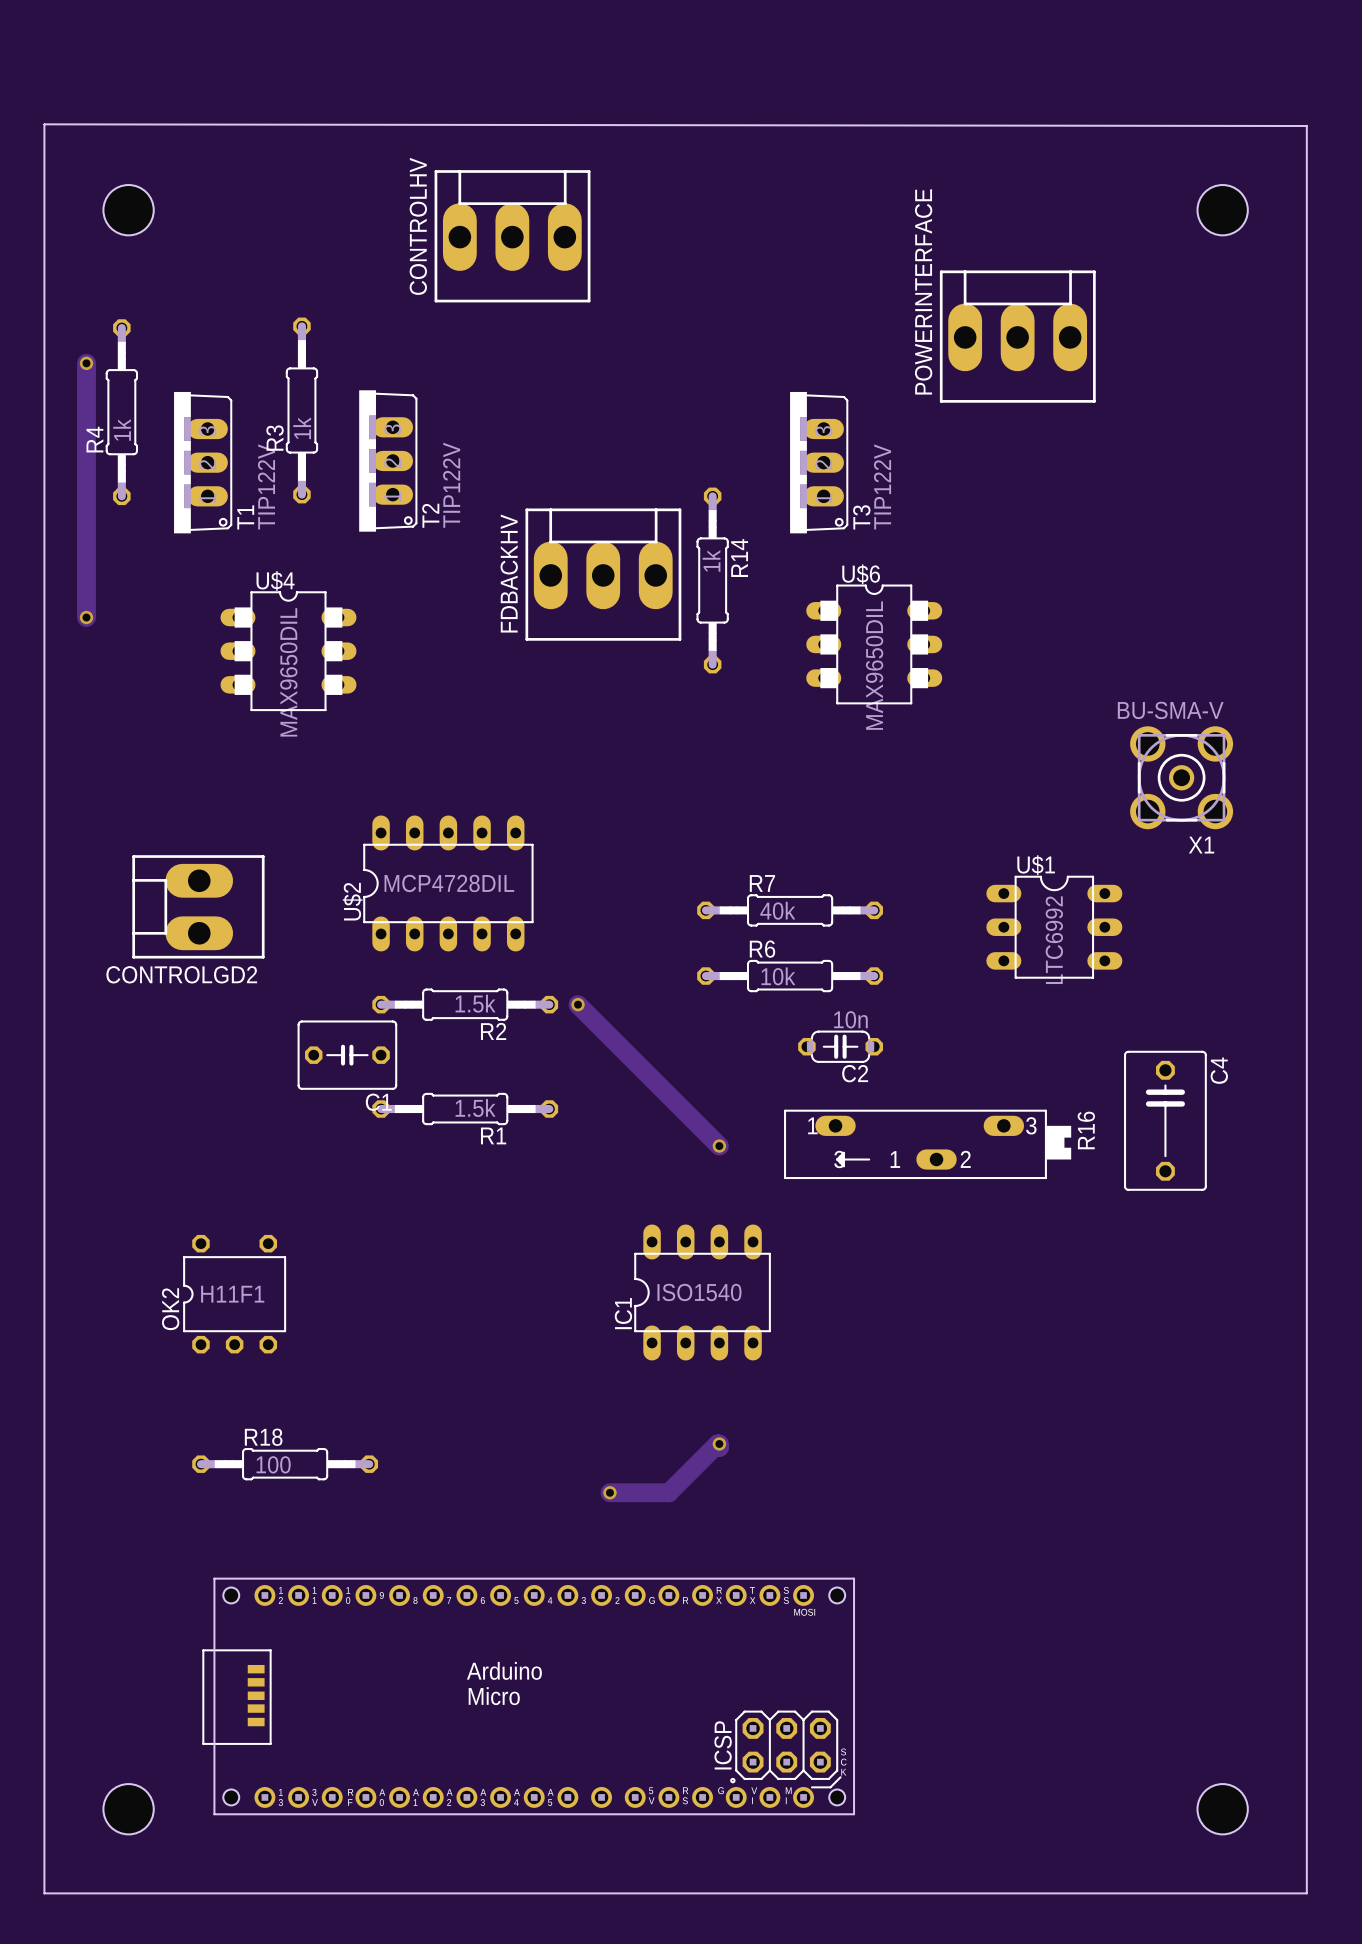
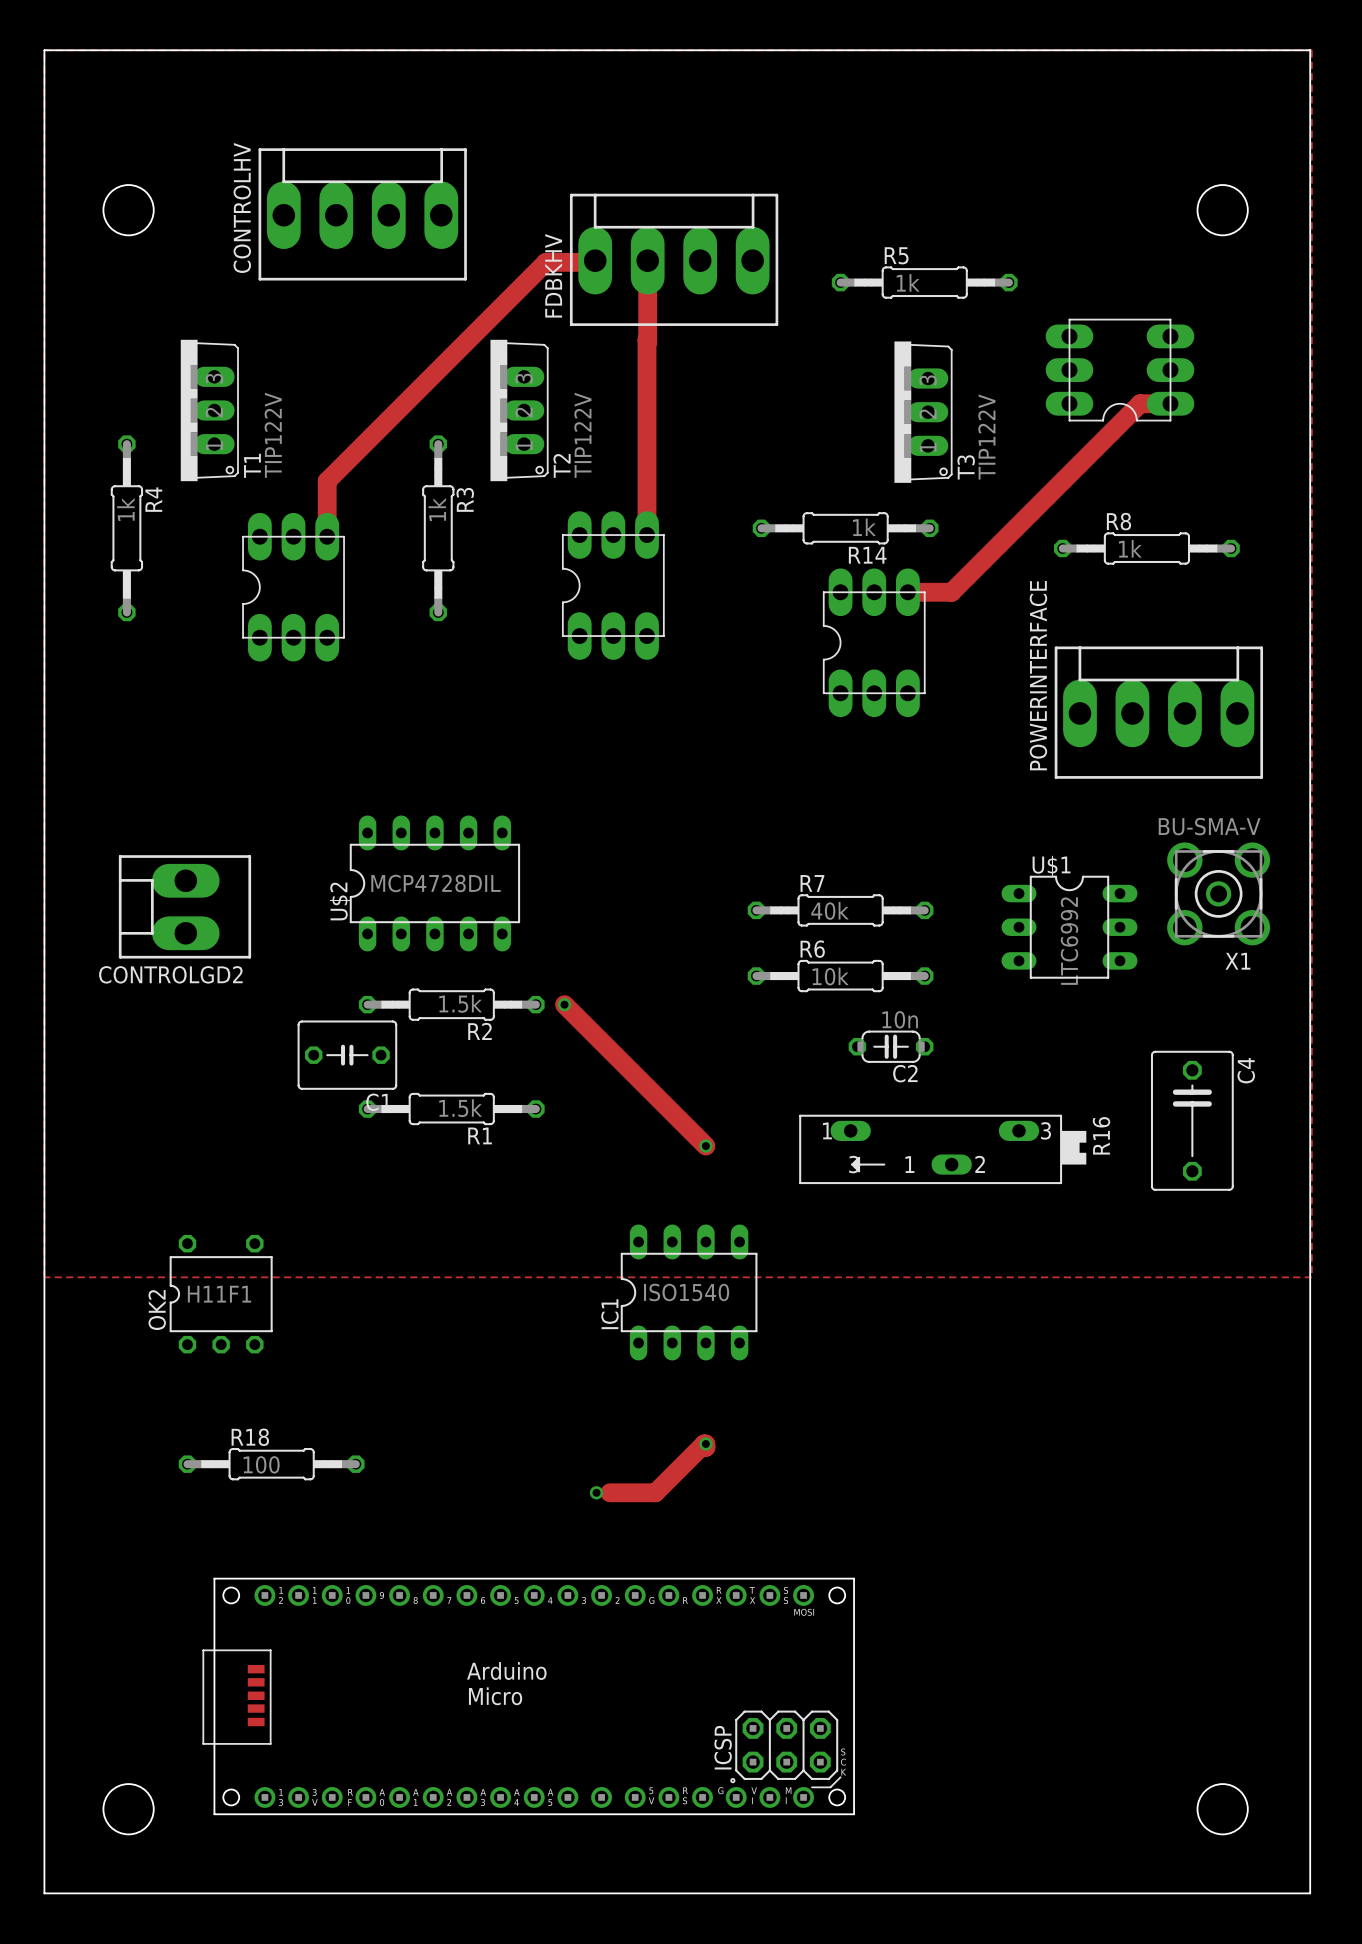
zone outline: none -> (44, 50) (1311, 50) (1311, 1277) (44, 1277) (44, 50)
board edge: (44, 124) (1306, 126) (1306, 1893) -> (44, 124) (44, 50) (1310, 50) (1310, 1893) (1306, 1893)
CONTROLHV: none -> (362, 214)
CONTROLHV: (512, 236) -> none
FDBKHV: none -> (674, 259)
track: none -> (595, 260) (590, 262) (546, 262) (327, 481) (327, 536)
track: none -> (647, 260) (647, 535)
R5: none -> 1k (924, 282)
POWERINTERFACE: (1017, 336) -> none
track: (86, 363) (86, 617) -> none
via: (86, 363) -> none
part: none -> (1119, 370)
track: none -> (1170, 403) (1140, 403) (951, 592) (907, 592)
R3 position: (301, 410) -> (438, 528)
R4 position: (121, 412) -> (126, 528)
R3 value position: 1k (302, 428) -> 1k (437, 509)
R4 value position: 1k (122, 429) -> 1k (125, 509)
R3 name position: R3 (275, 438) -> R3 (465, 499)
R4 name position: R4 (94, 439) -> R4 (153, 499)
T2 position: (388, 460) -> (519, 410)
T1 position: (203, 462) -> (209, 410)
T3 position: (819, 462) -> (923, 412)
R8: none -> 1k (1146, 548)
FDBACKHV: (603, 574) -> none
R14 rotation: 0° (712, 580) -> 90° clockwise (845, 528)
R14 position: (712, 580) -> (845, 528)
part: none -> (613, 585)
part: none -> (293, 587)
via: (86, 617) -> none
part: none -> (874, 642)
U$6: MAX9650DIL (874, 644) -> none
U$4: MAX9650DIL (288, 651) -> none
POWERINTERFACE: none -> (1158, 712)
X1 position: (1181, 777) -> (1218, 893)
U$2 position: (448, 883) -> (434, 883)
CONTROLGD2 position: (198, 906) -> (184, 906)
R7 position: (790, 910) -> (840, 910)
U$1 position: (1054, 927) -> (1069, 927)
R6 position: (790, 976) -> (840, 976)
R2 position: (465, 1004) -> (451, 1004)
track: (578, 1004) (719, 1146) -> (564, 1004) (705, 1146)
via position: (578, 1004) -> (564, 1004)
C2 position: (840, 1046) -> (891, 1046)
R1 position: (465, 1109) -> (451, 1109)
C4 position: (1165, 1120) -> (1192, 1120)
R16 position: (927, 1144) -> (942, 1149)
via position: (719, 1146) -> (705, 1146)
IC1 position: (702, 1292) -> (689, 1292)
OK2 position: (234, 1294) -> (221, 1294)
track: (719, 1443) (719, 1447) (717, 1443) (668, 1492) (655, 1492) -> (705, 1443) (705, 1447) (704, 1443) (655, 1492)
via position: (719, 1443) -> (705, 1443)
R18 position: (285, 1464) -> (271, 1464)
via position: (609, 1492) -> (596, 1492)

